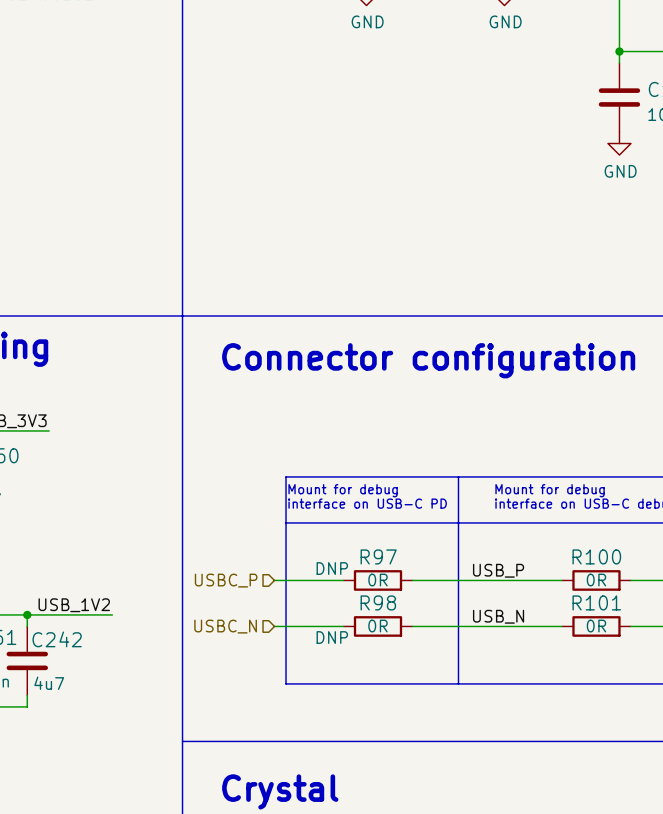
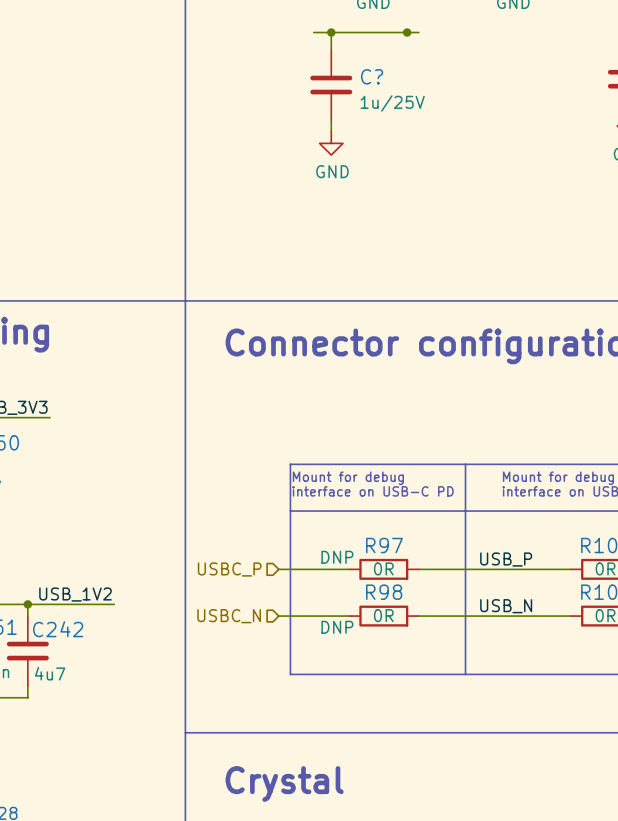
wire: none -> (313, 32) (418, 32)
wire: none -> (331, 32) (331, 50)
junction: none -> (331, 32)
junction: none -> (407, 32)
C?: none -> (331, 85)
wire: none -> (331, 120) (331, 131)
power symbol: none -> GND (331, 143)

